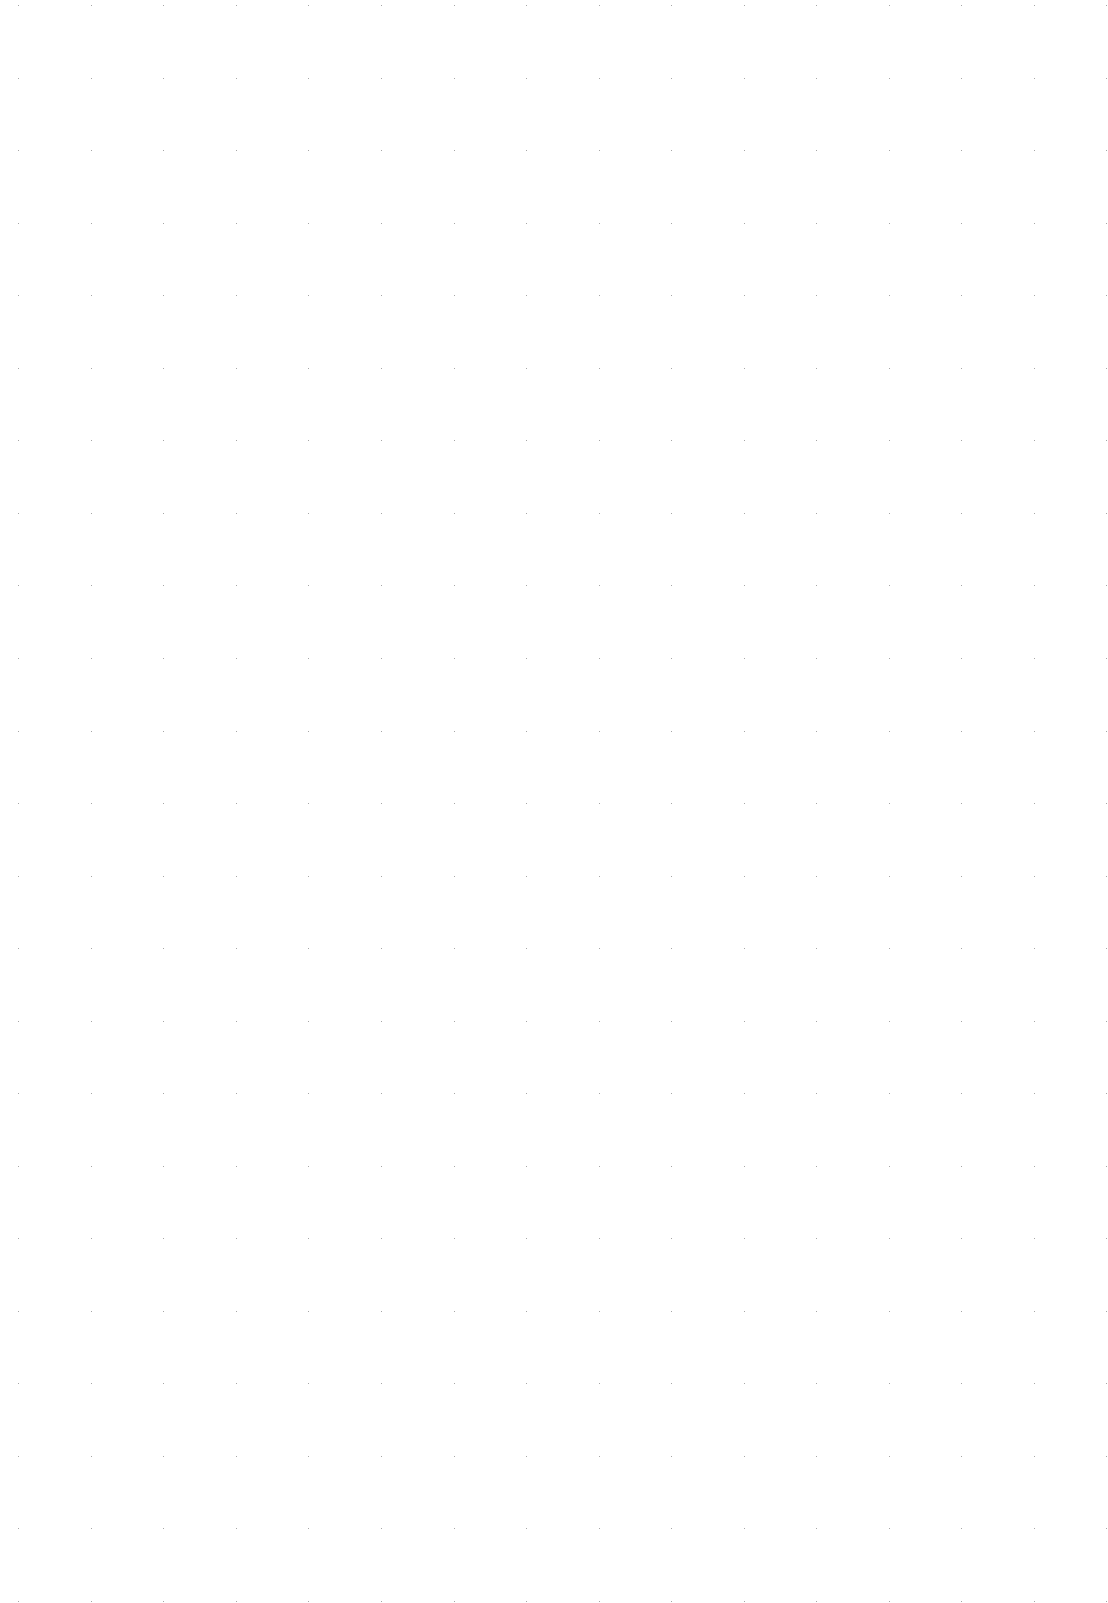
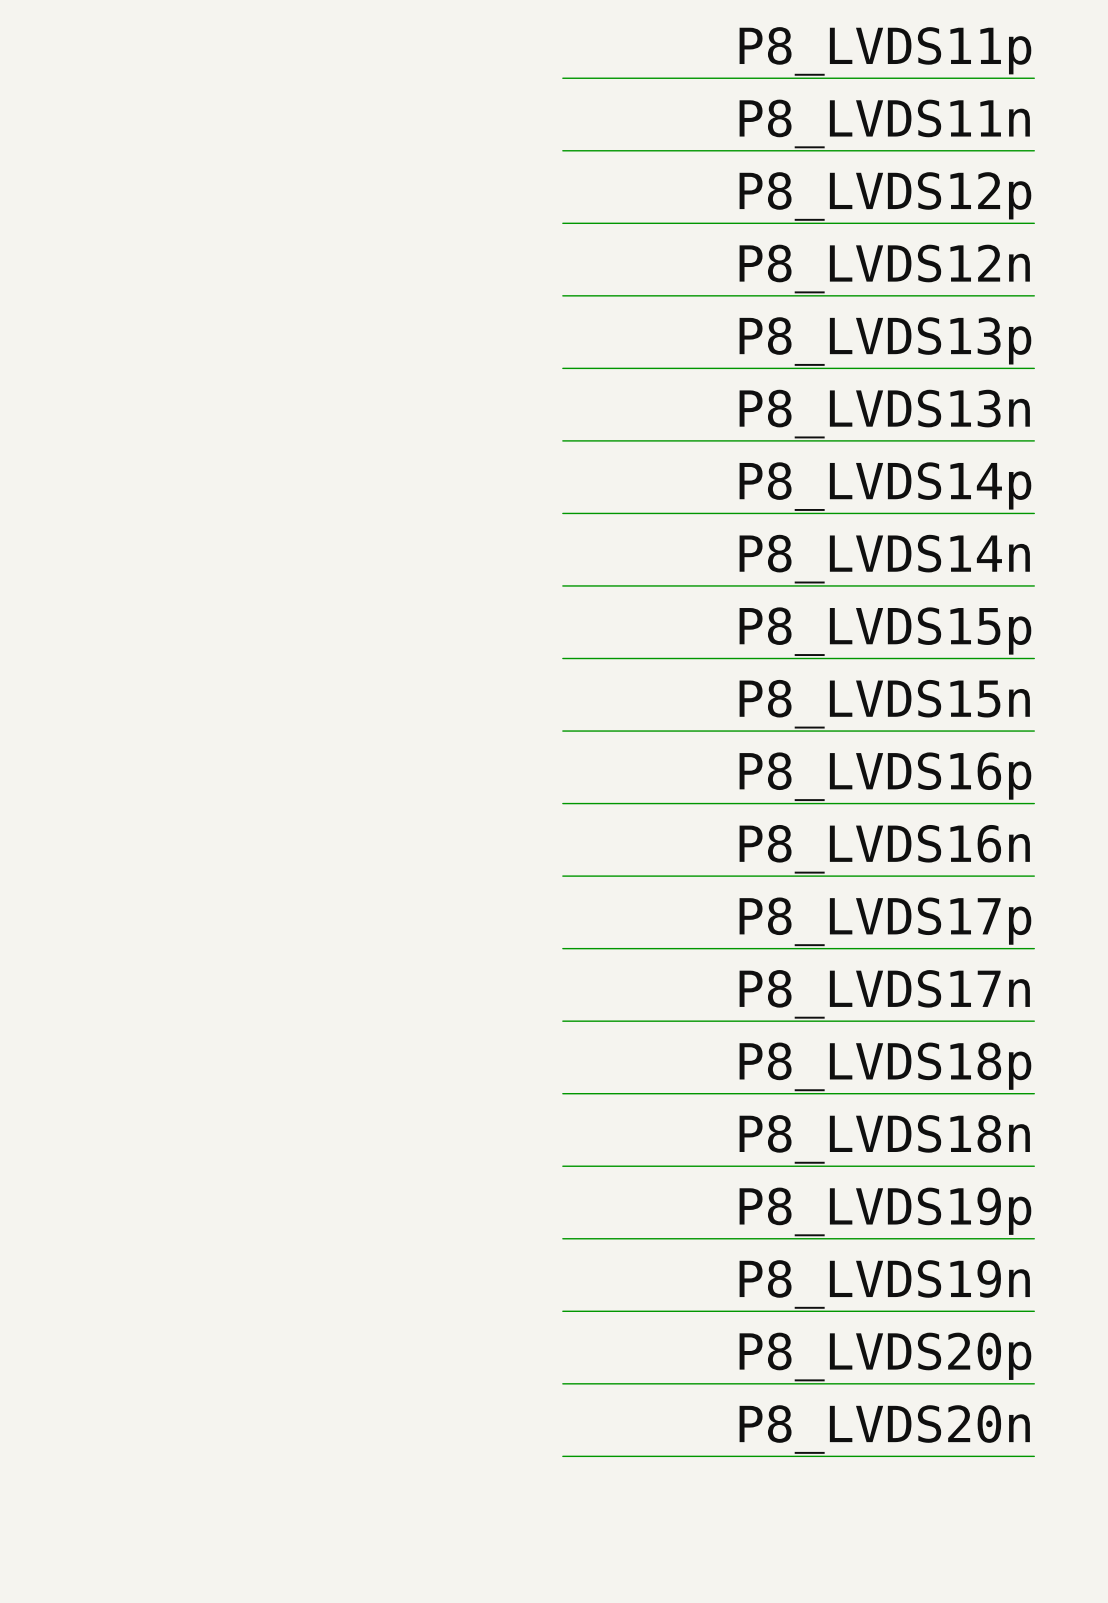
label: none -> P8_LVDS11p (885, 51)
wire: none -> (562, 78) (1034, 78)
label: none -> P8_LVDS11n (884, 123)
wire: none -> (562, 150) (1034, 150)
label: none -> P8_LVDS12p (885, 196)
wire: none -> (562, 223) (1034, 223)
label: none -> P8_LVDS12n (884, 269)
wire: none -> (562, 295) (1034, 295)
label: none -> P8_LVDS13p (885, 341)
wire: none -> (562, 368) (1034, 368)
label: none -> P8_LVDS13n (884, 414)
wire: none -> (562, 440) (1034, 440)
label: none -> P8_LVDS14p (885, 486)
wire: none -> (562, 513) (1034, 513)
label: none -> P8_LVDS14n (884, 559)
wire: none -> (562, 585) (1034, 585)
label: none -> P8_LVDS15p (885, 631)
wire: none -> (562, 658) (1034, 658)
label: none -> P8_LVDS15n (884, 704)
wire: none -> (562, 731) (1034, 731)
label: none -> P8_LVDS16p (885, 776)
wire: none -> (562, 803) (1034, 803)
label: none -> P8_LVDS16n (884, 849)
wire: none -> (562, 876) (1034, 876)
label: none -> P8_LVDS17p (885, 921)
wire: none -> (562, 948) (1034, 948)
label: none -> P8_LVDS17n (884, 994)
wire: none -> (562, 1021) (1034, 1021)
label: none -> P8_LVDS18p (885, 1066)
wire: none -> (562, 1093) (1034, 1093)
label: none -> P8_LVDS18n (884, 1139)
wire: none -> (562, 1166) (1034, 1166)
label: none -> P8_LVDS19p (885, 1211)
wire: none -> (562, 1238) (1034, 1238)
label: none -> P8_LVDS19n (884, 1284)
wire: none -> (562, 1311) (1034, 1311)
label: none -> P8_LVDS20p (885, 1357)
wire: none -> (562, 1383) (1034, 1383)
label: none -> P8_LVDS20n (884, 1429)
wire: none -> (562, 1456) (1034, 1456)

